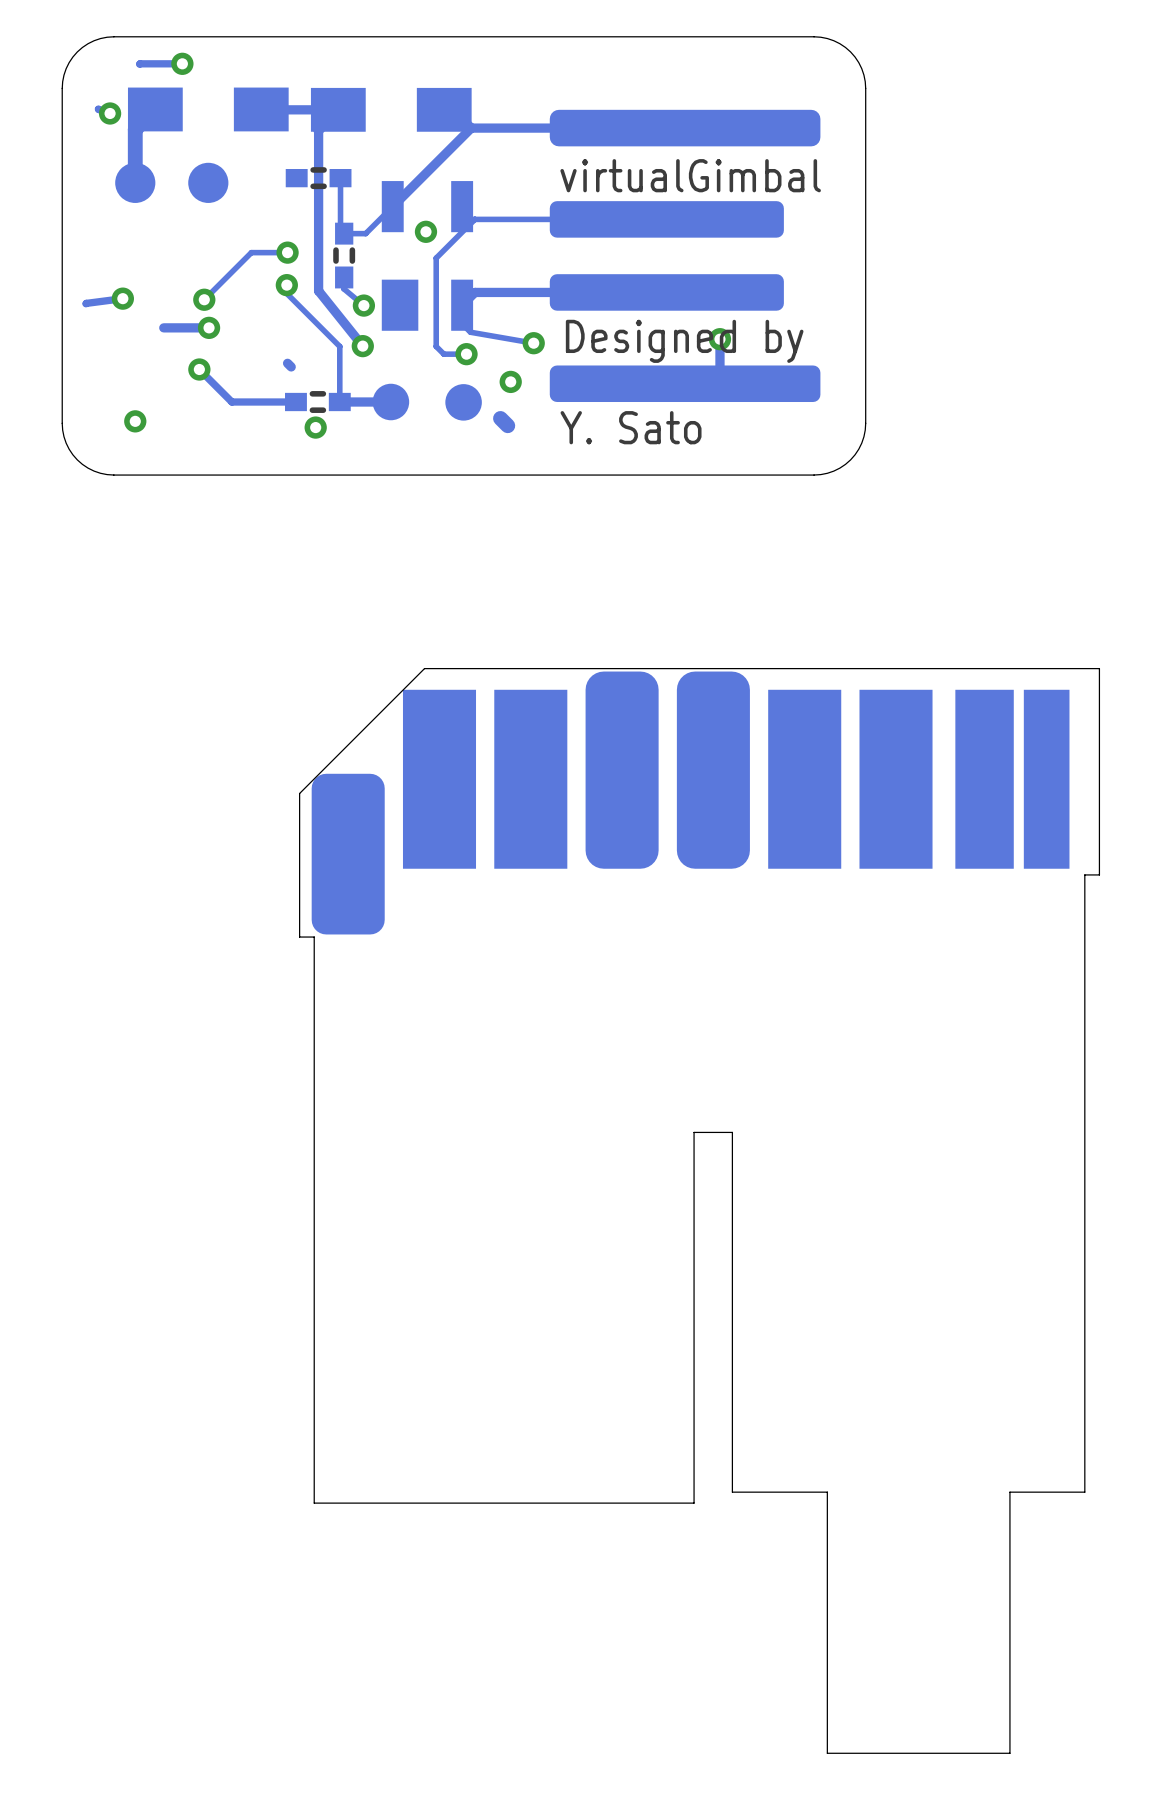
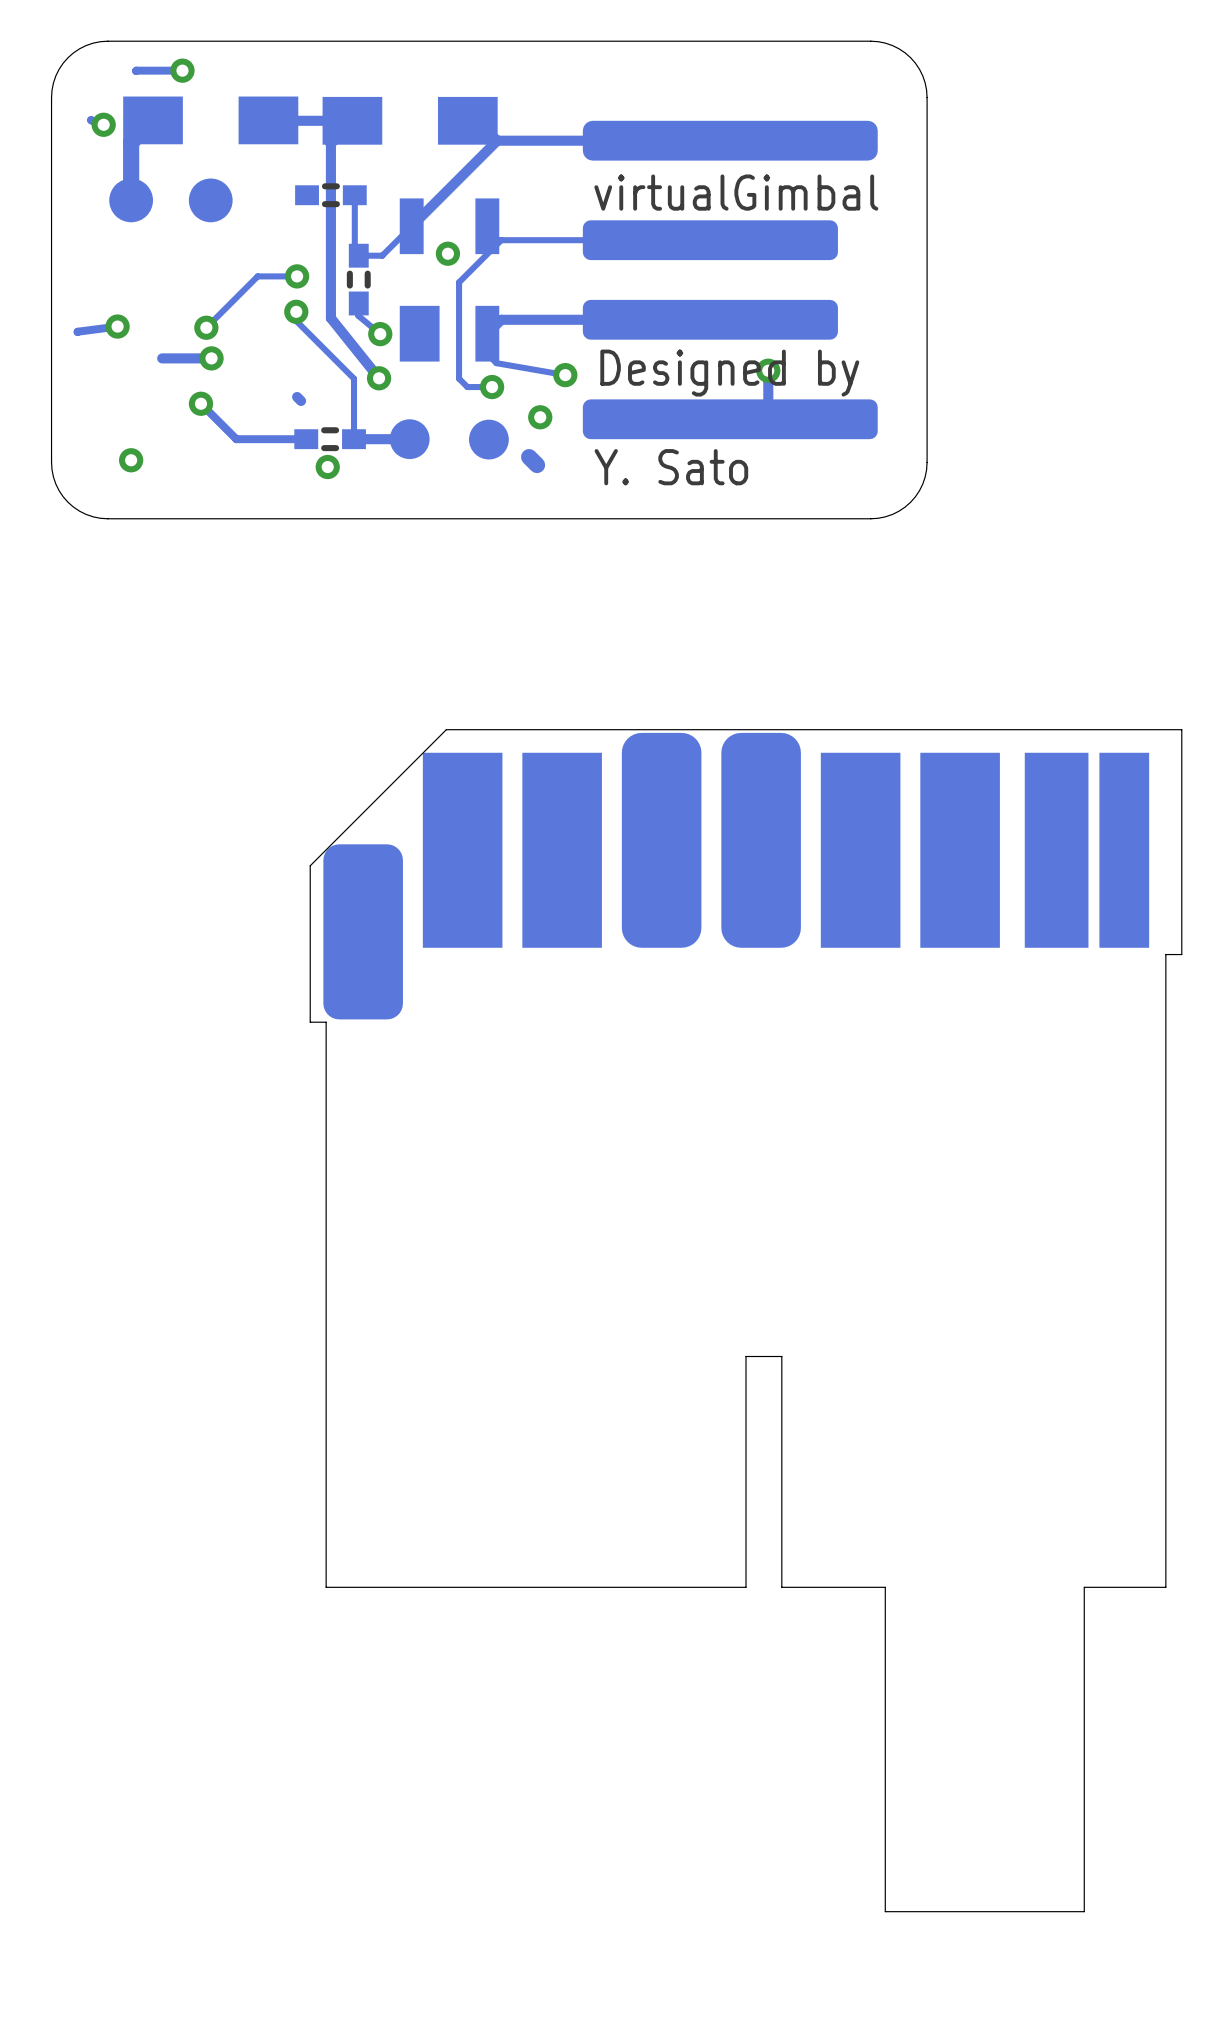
board edge: (732, 1243) (732, 1132) (694, 1132) (694, 1503) (314, 1503) (314, 1455) -> (781, 1356) (746, 1356) (746, 1587) (326, 1587)
board edge: (732, 1455) (732, 1492) (827, 1492) -> (781, 1587) (885, 1587) (885, 1627)
board edge: (1084, 1455) (1084, 1492) (1009, 1492) -> (1165, 1587) (1084, 1587) (1084, 1627)

